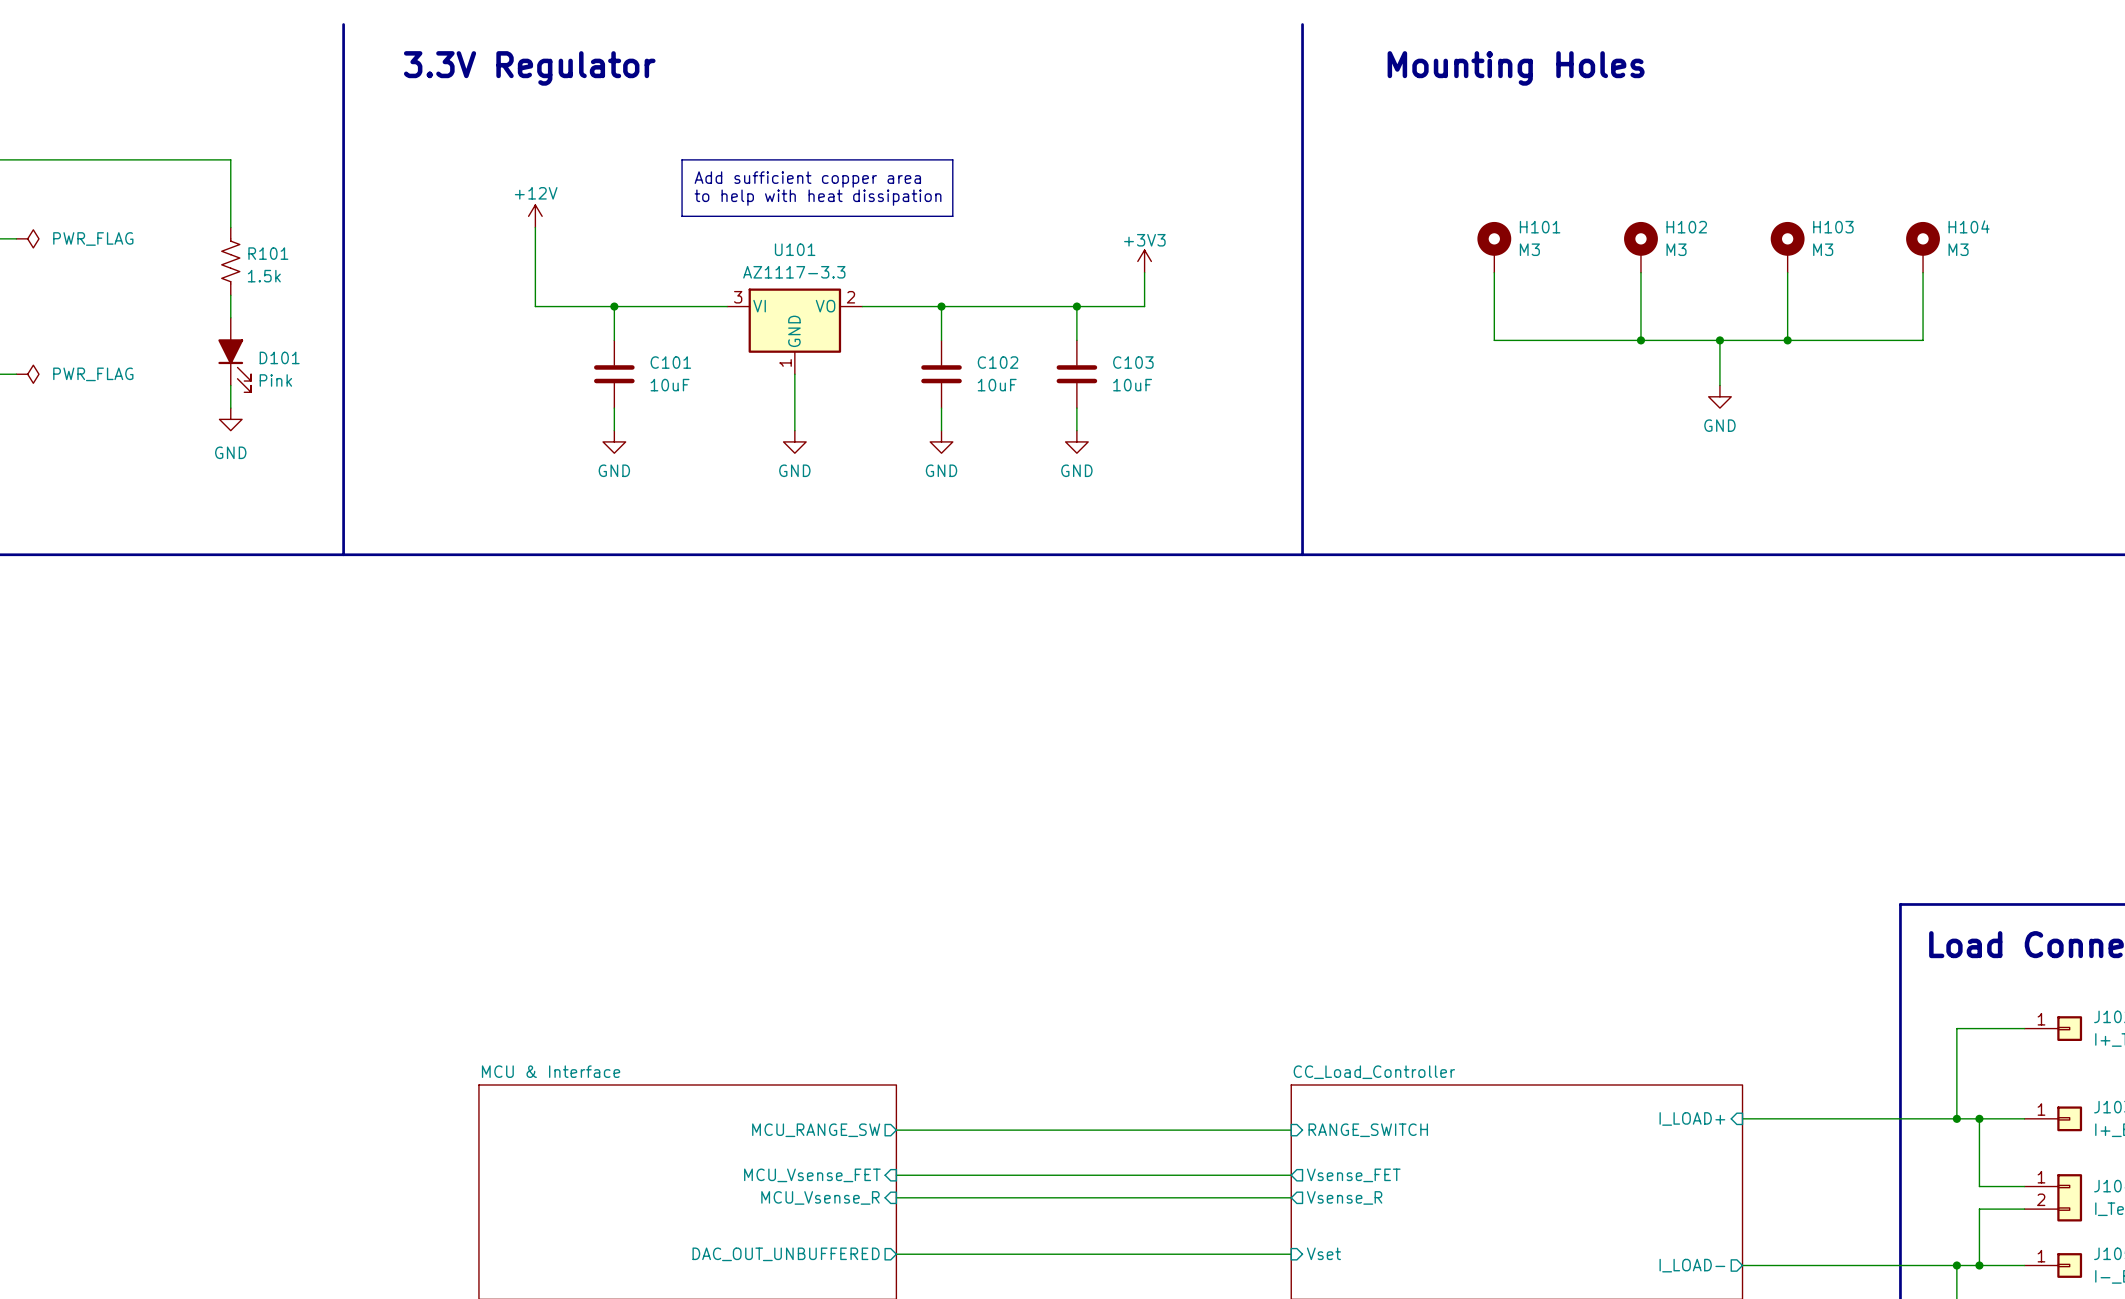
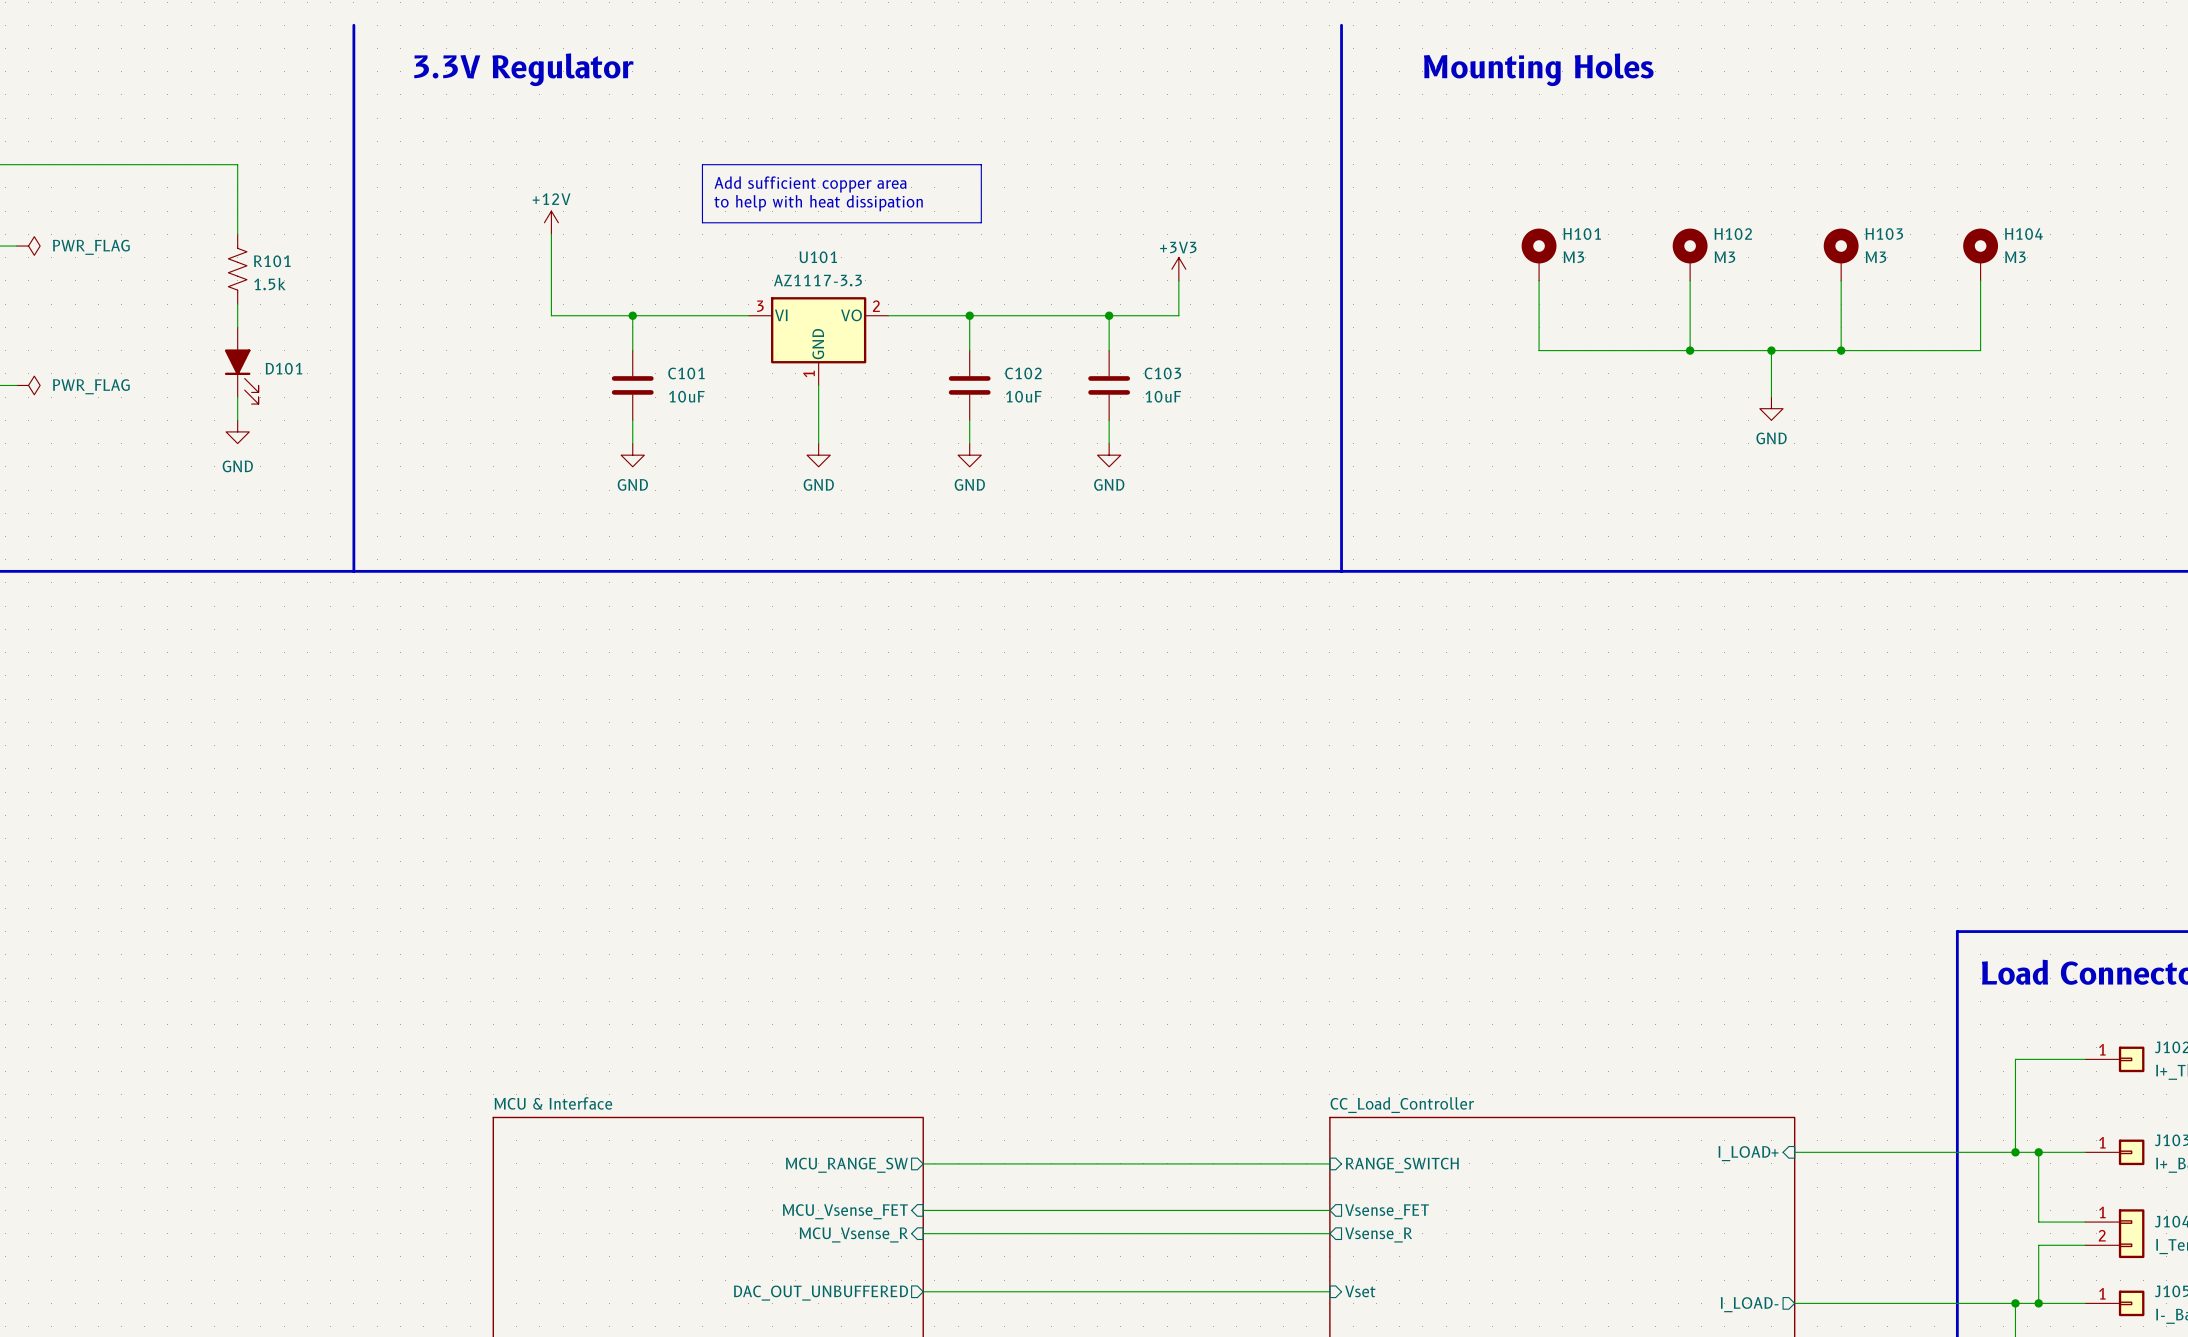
D101 value: Pink (275, 380) -> none

